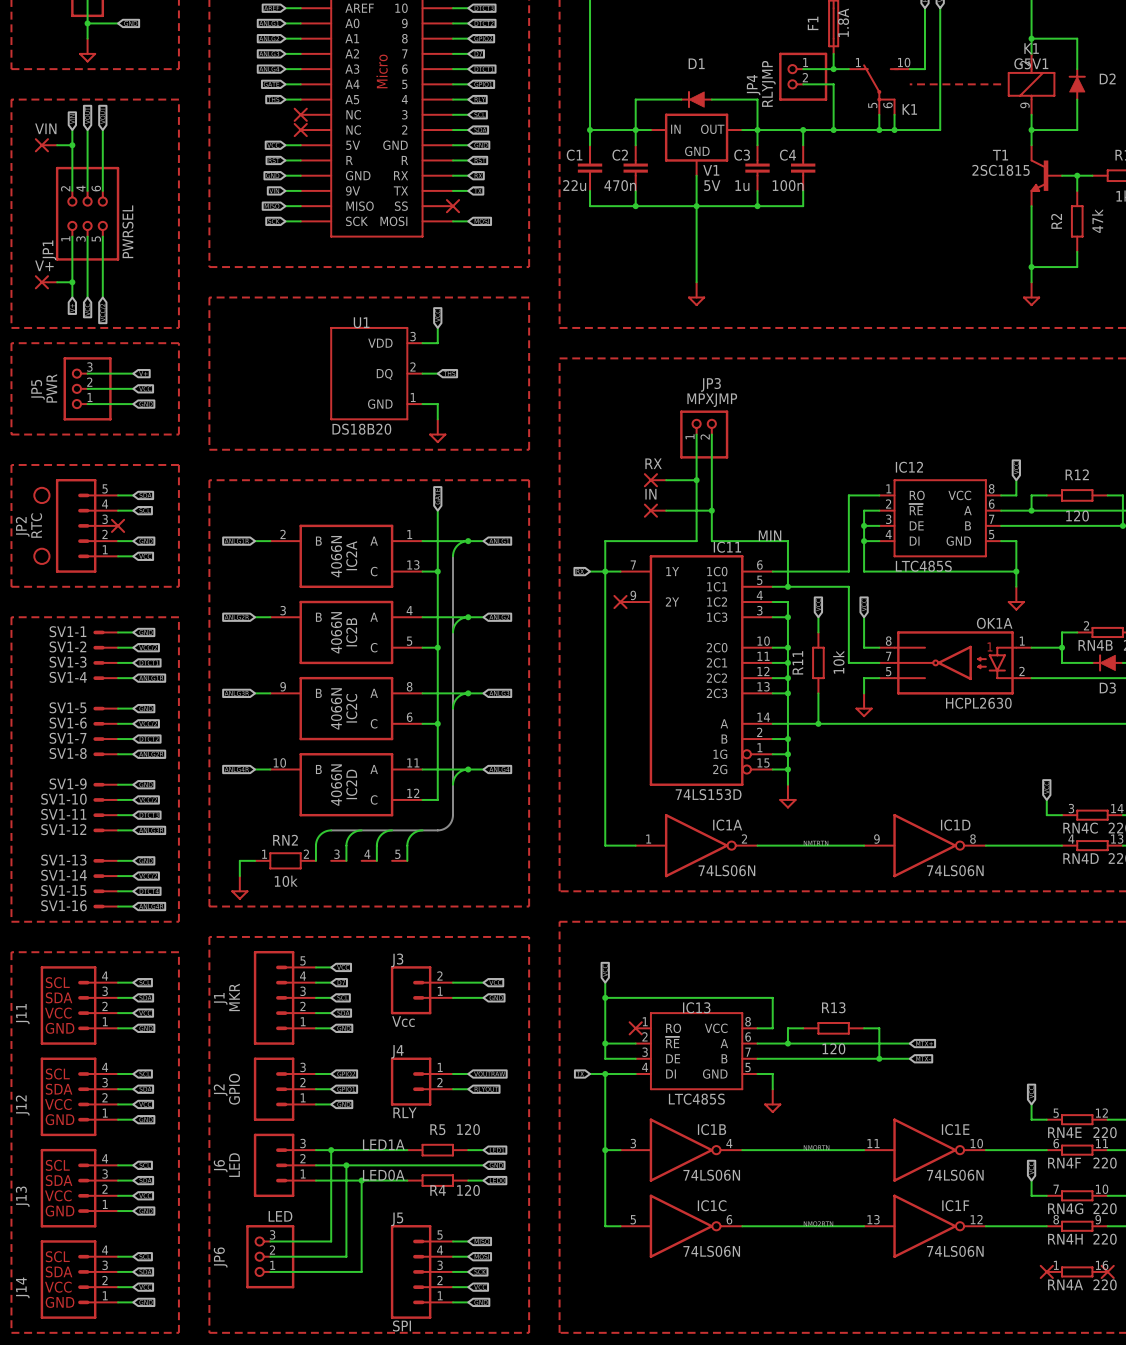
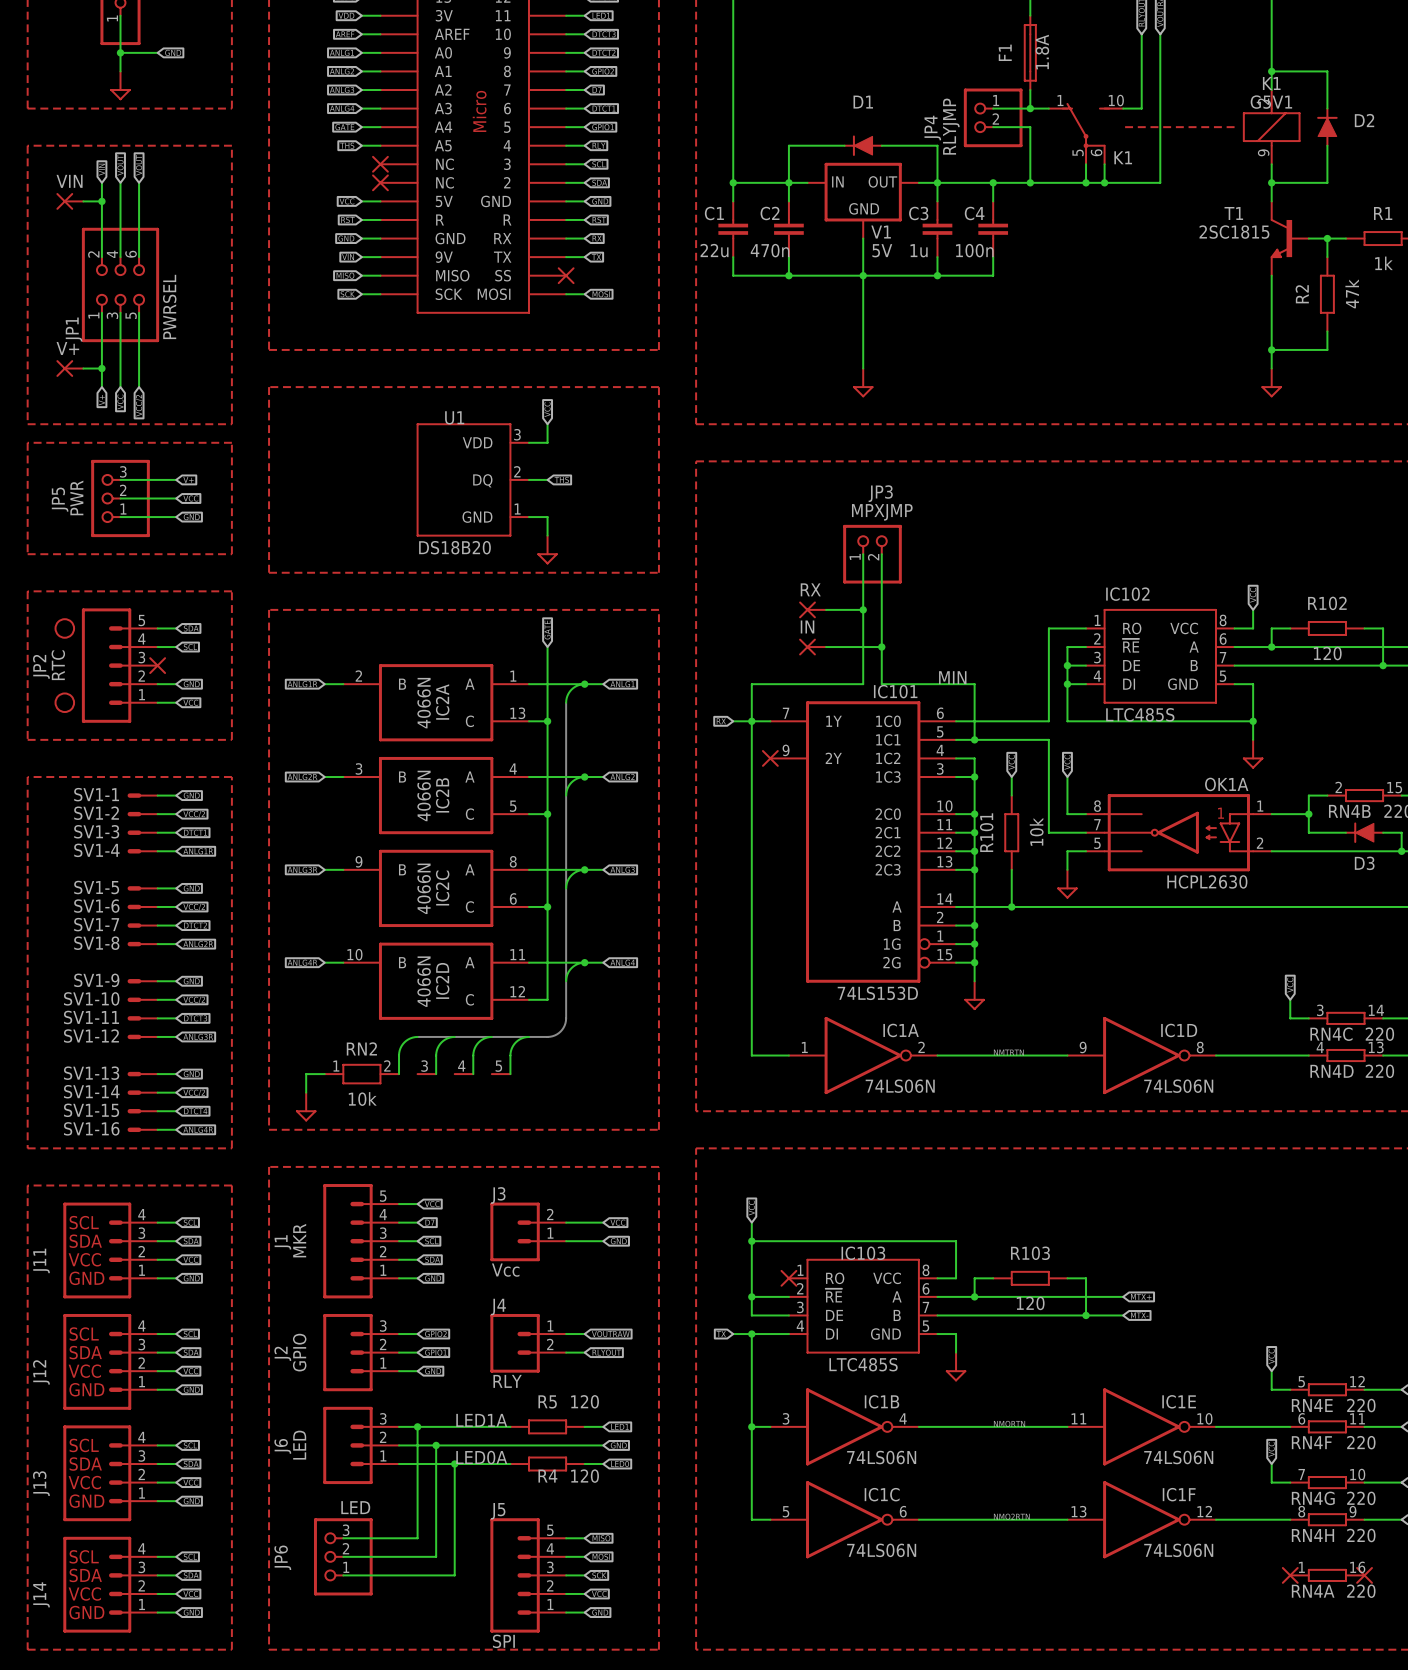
IC12 name: IC12 (909, 467) -> IC102 (1127, 594)
R12 name: R12 (1077, 474) -> R102 (1327, 603)
IC11 name: IC11 (727, 547) -> IC101 (895, 691)
R11 name: R11 (797, 662) -> R101 (986, 832)
IC13 name: IC13 (696, 1007) -> IC103 (863, 1253)
R13 name: R13 (833, 1007) -> R103 (1030, 1253)

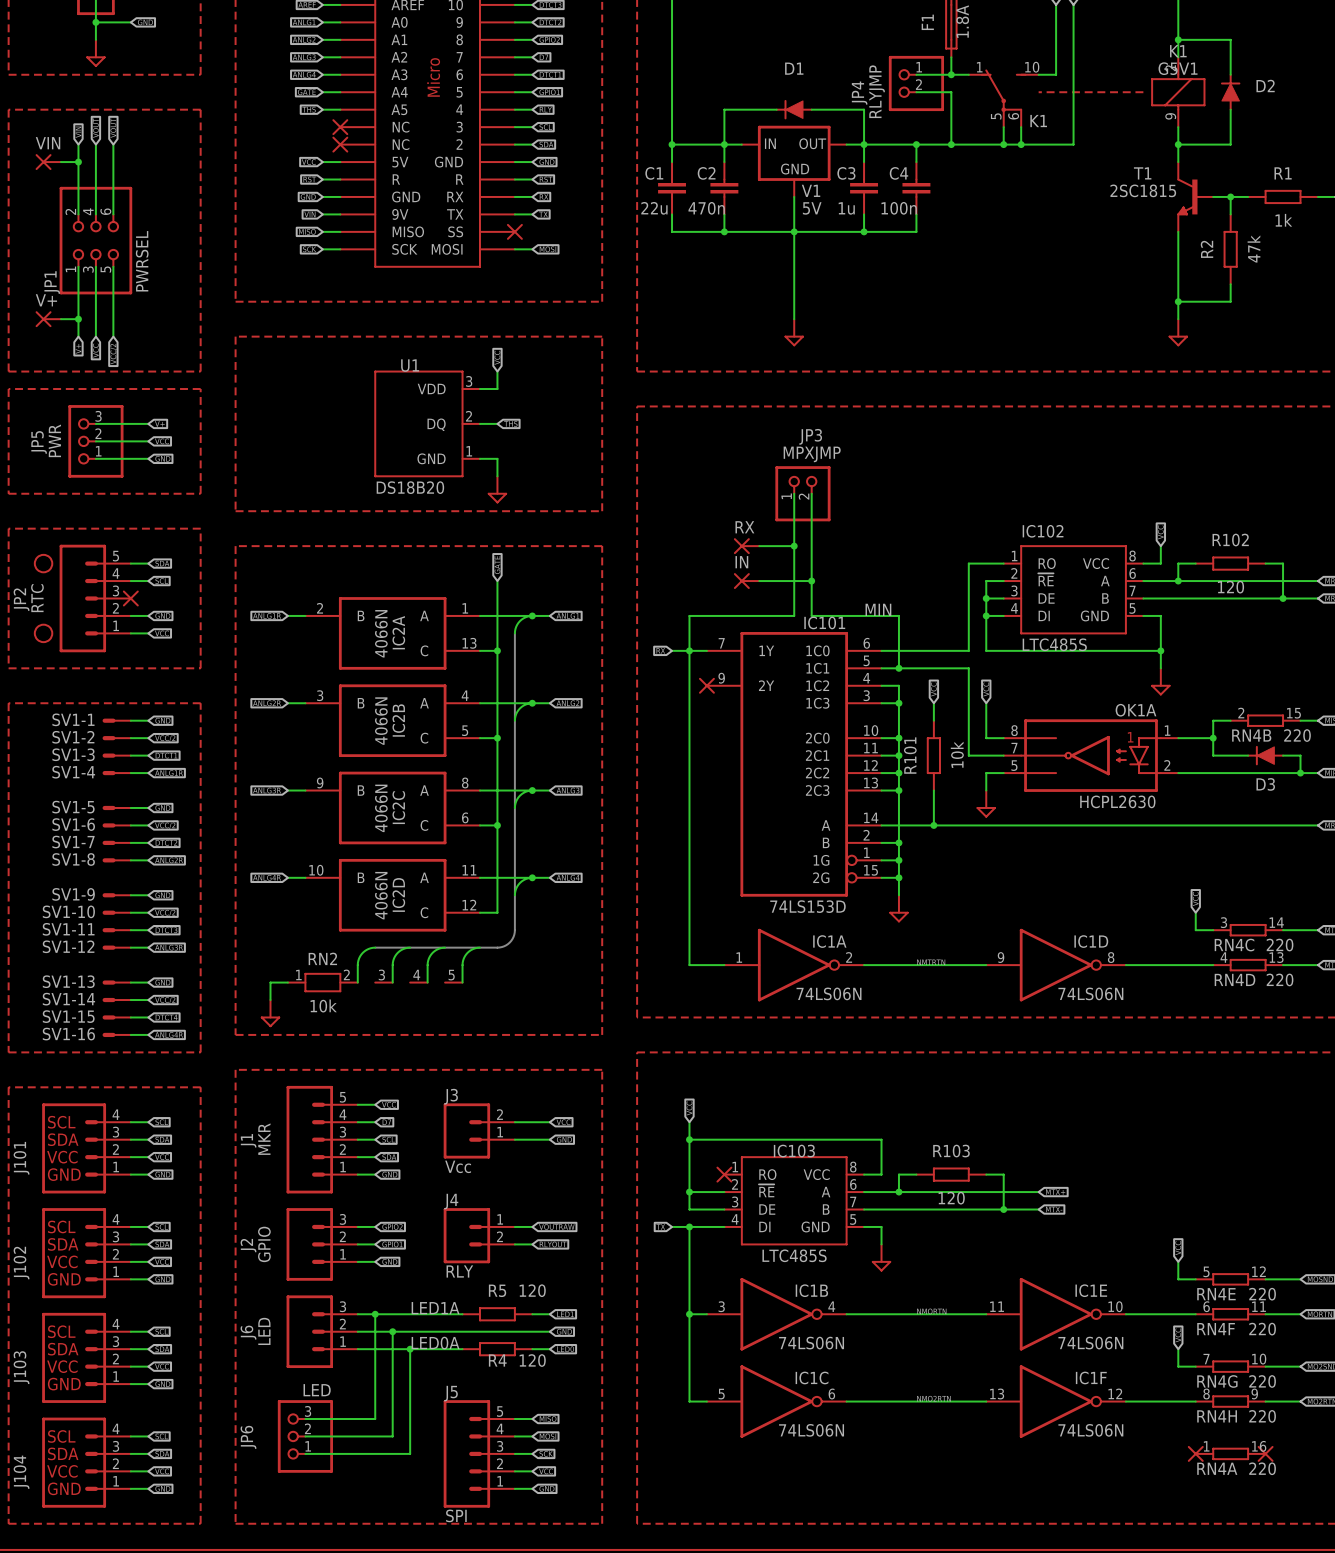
J11 name: J11 (41, 1260) -> J101 (21, 1158)
J12 name: J12 (41, 1372) -> J102 (21, 1263)
J13 name: J13 (41, 1483) -> J103 (21, 1367)
J14 name: J14 (41, 1594) -> J104 (21, 1472)

